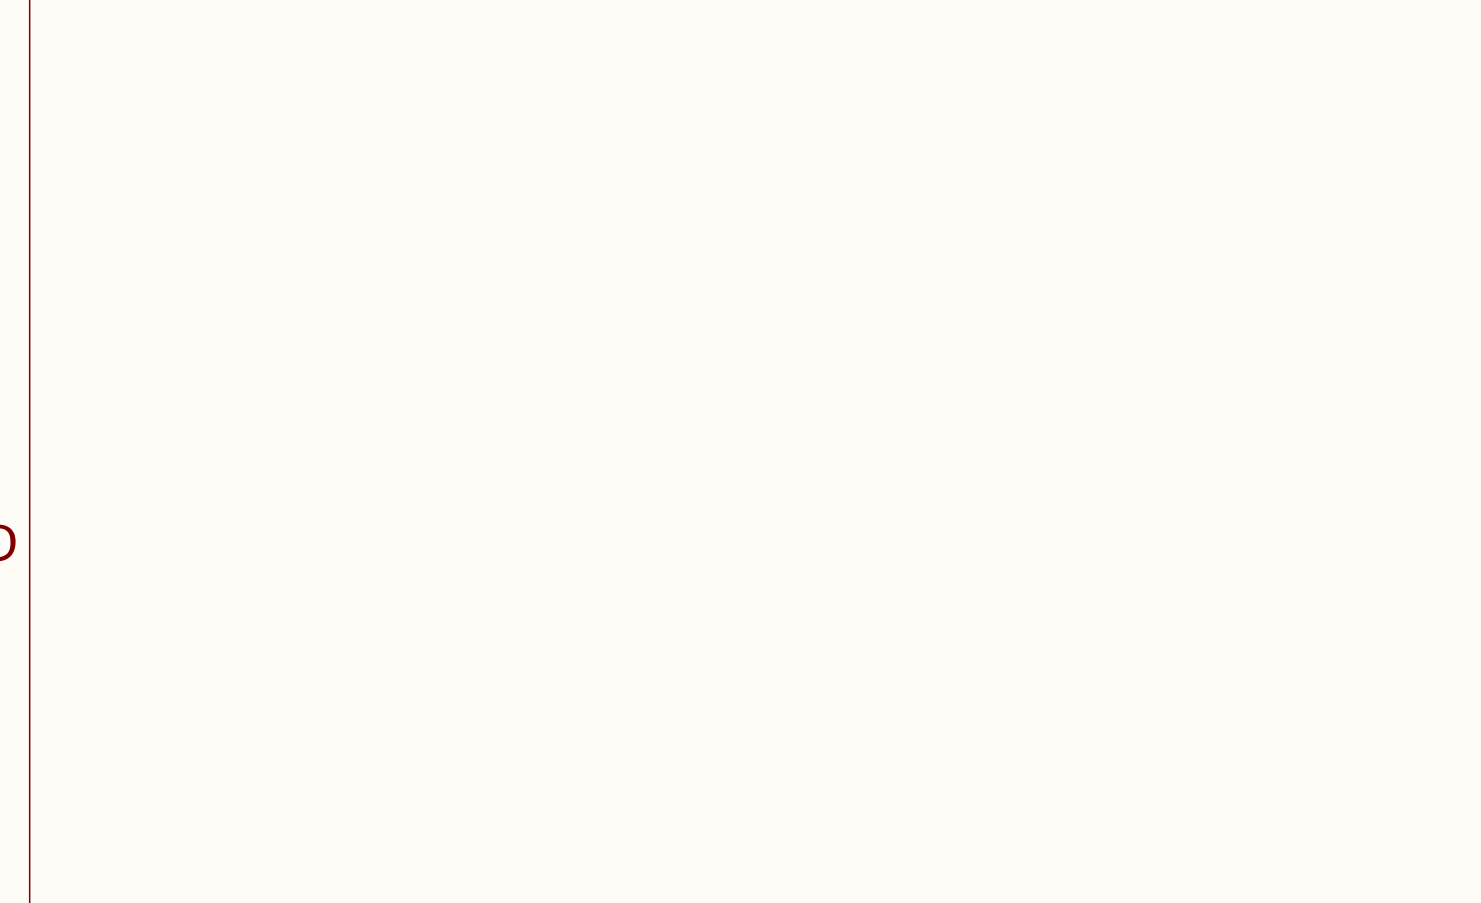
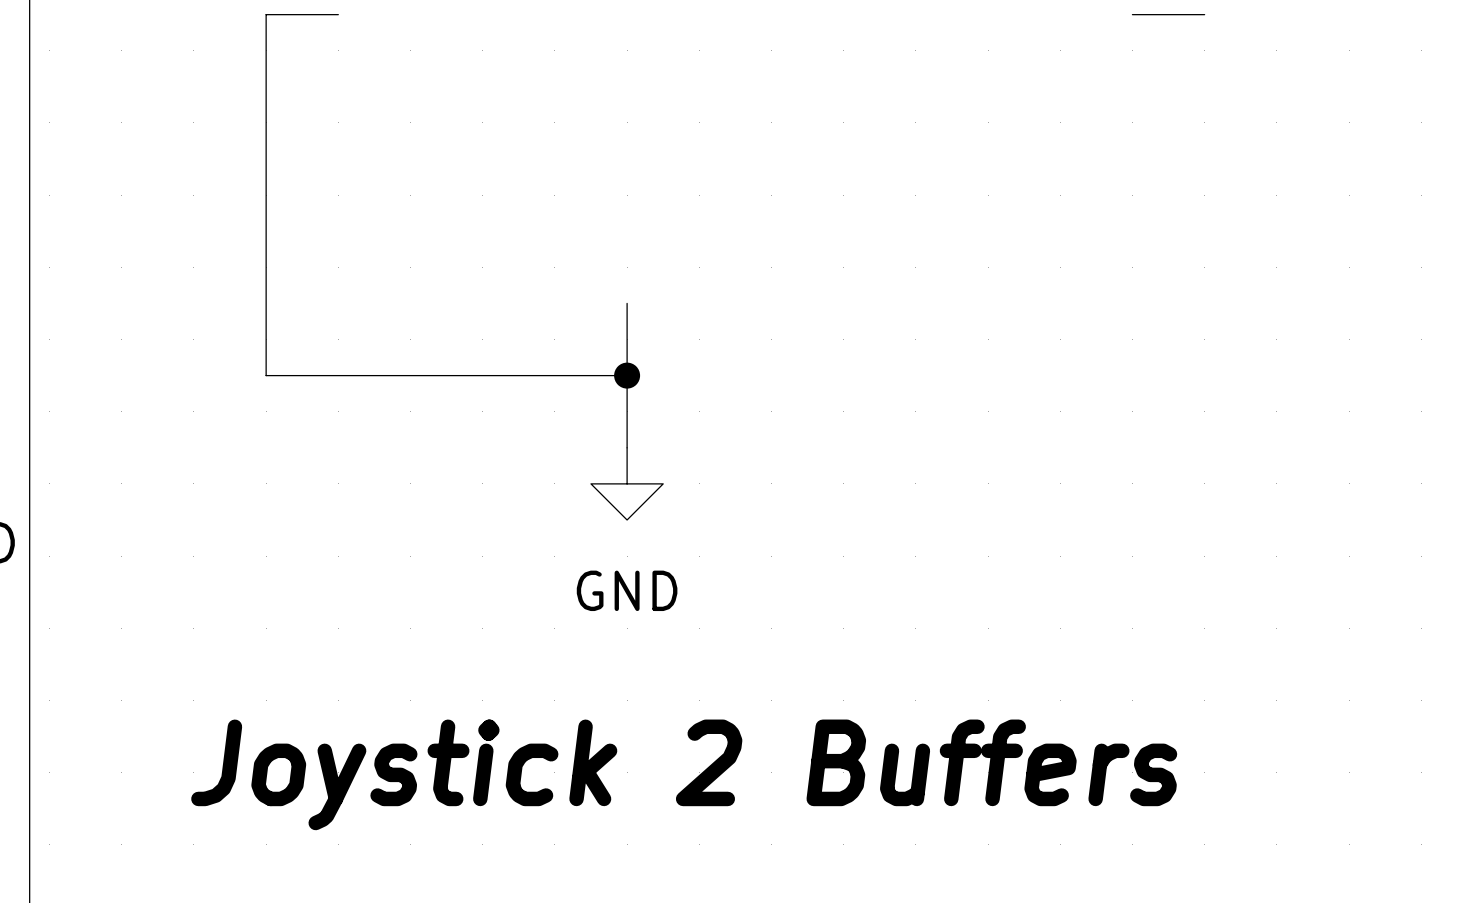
wire: none -> (338, 14) (266, 14) (266, 375) (627, 375)
wire: none -> (1132, 14) (1204, 14)
wire: none -> (627, 303) (627, 447)
junction: none -> (627, 375)
power symbol: none -> GND (627, 483)
text: none -> Joystick 2 Buffers (684, 774)

